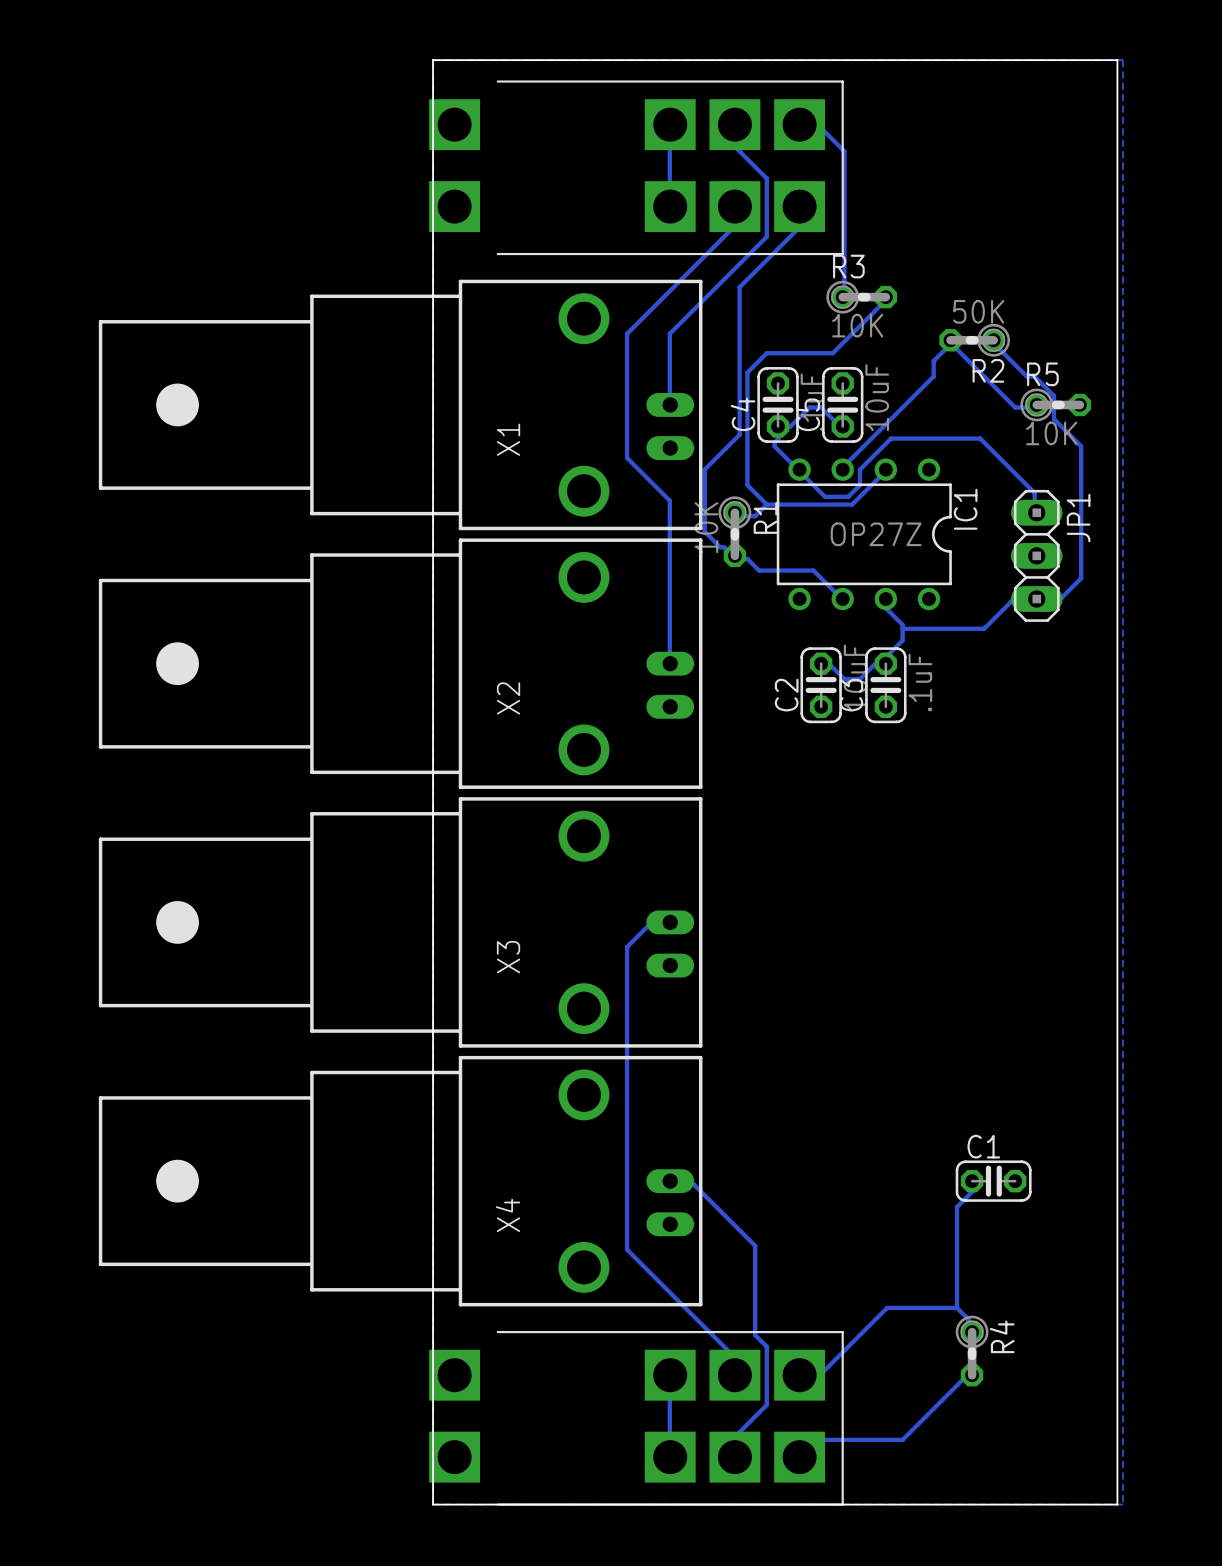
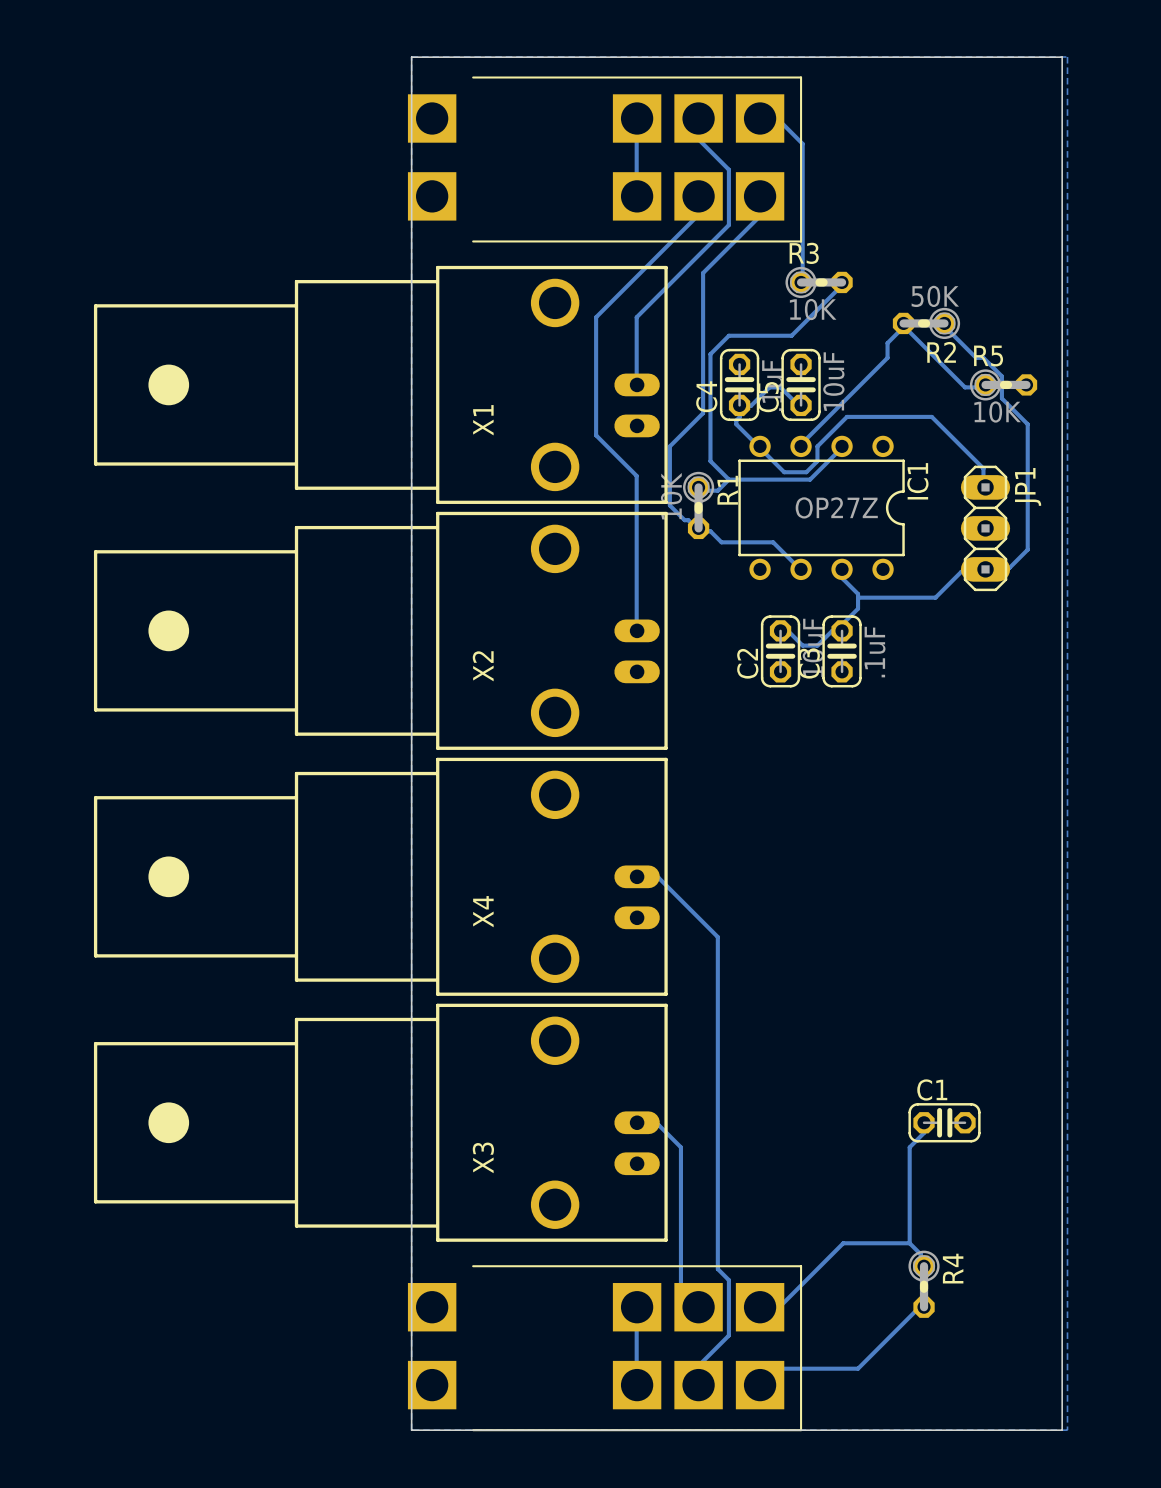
bottom track: (670, 922) (650, 923) (627, 947) (627, 1249) (731, 1354) (731, 1373) -> (637, 876) (658, 878) (717, 937) (717, 1184)
X3 name: X3 (508, 957) -> X4 (483, 911)
bottom track: (716, 1207) (755, 1245) -> (680, 1147) (680, 1291) (695, 1305)
X4 name: X4 (508, 1215) -> X3 (483, 1157)

